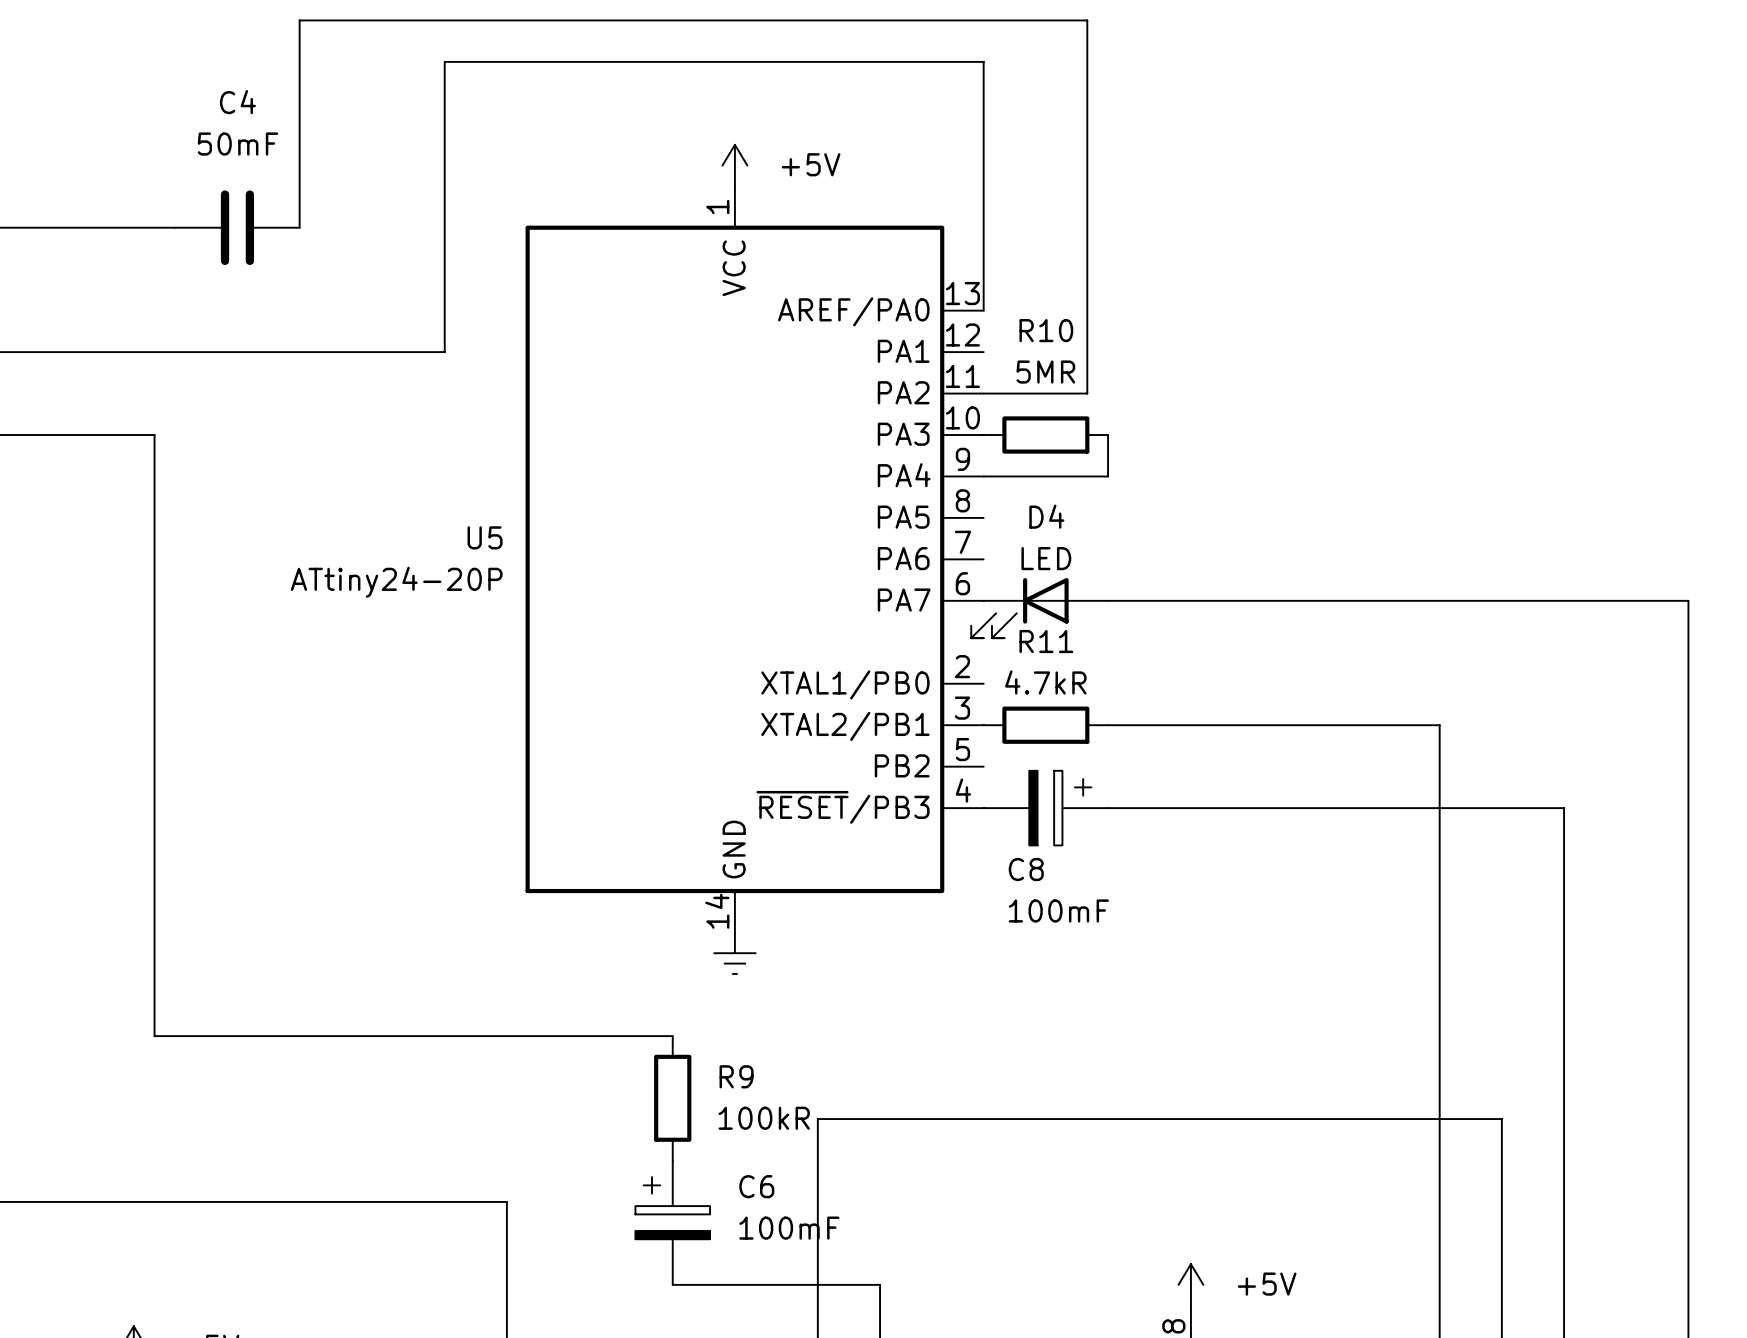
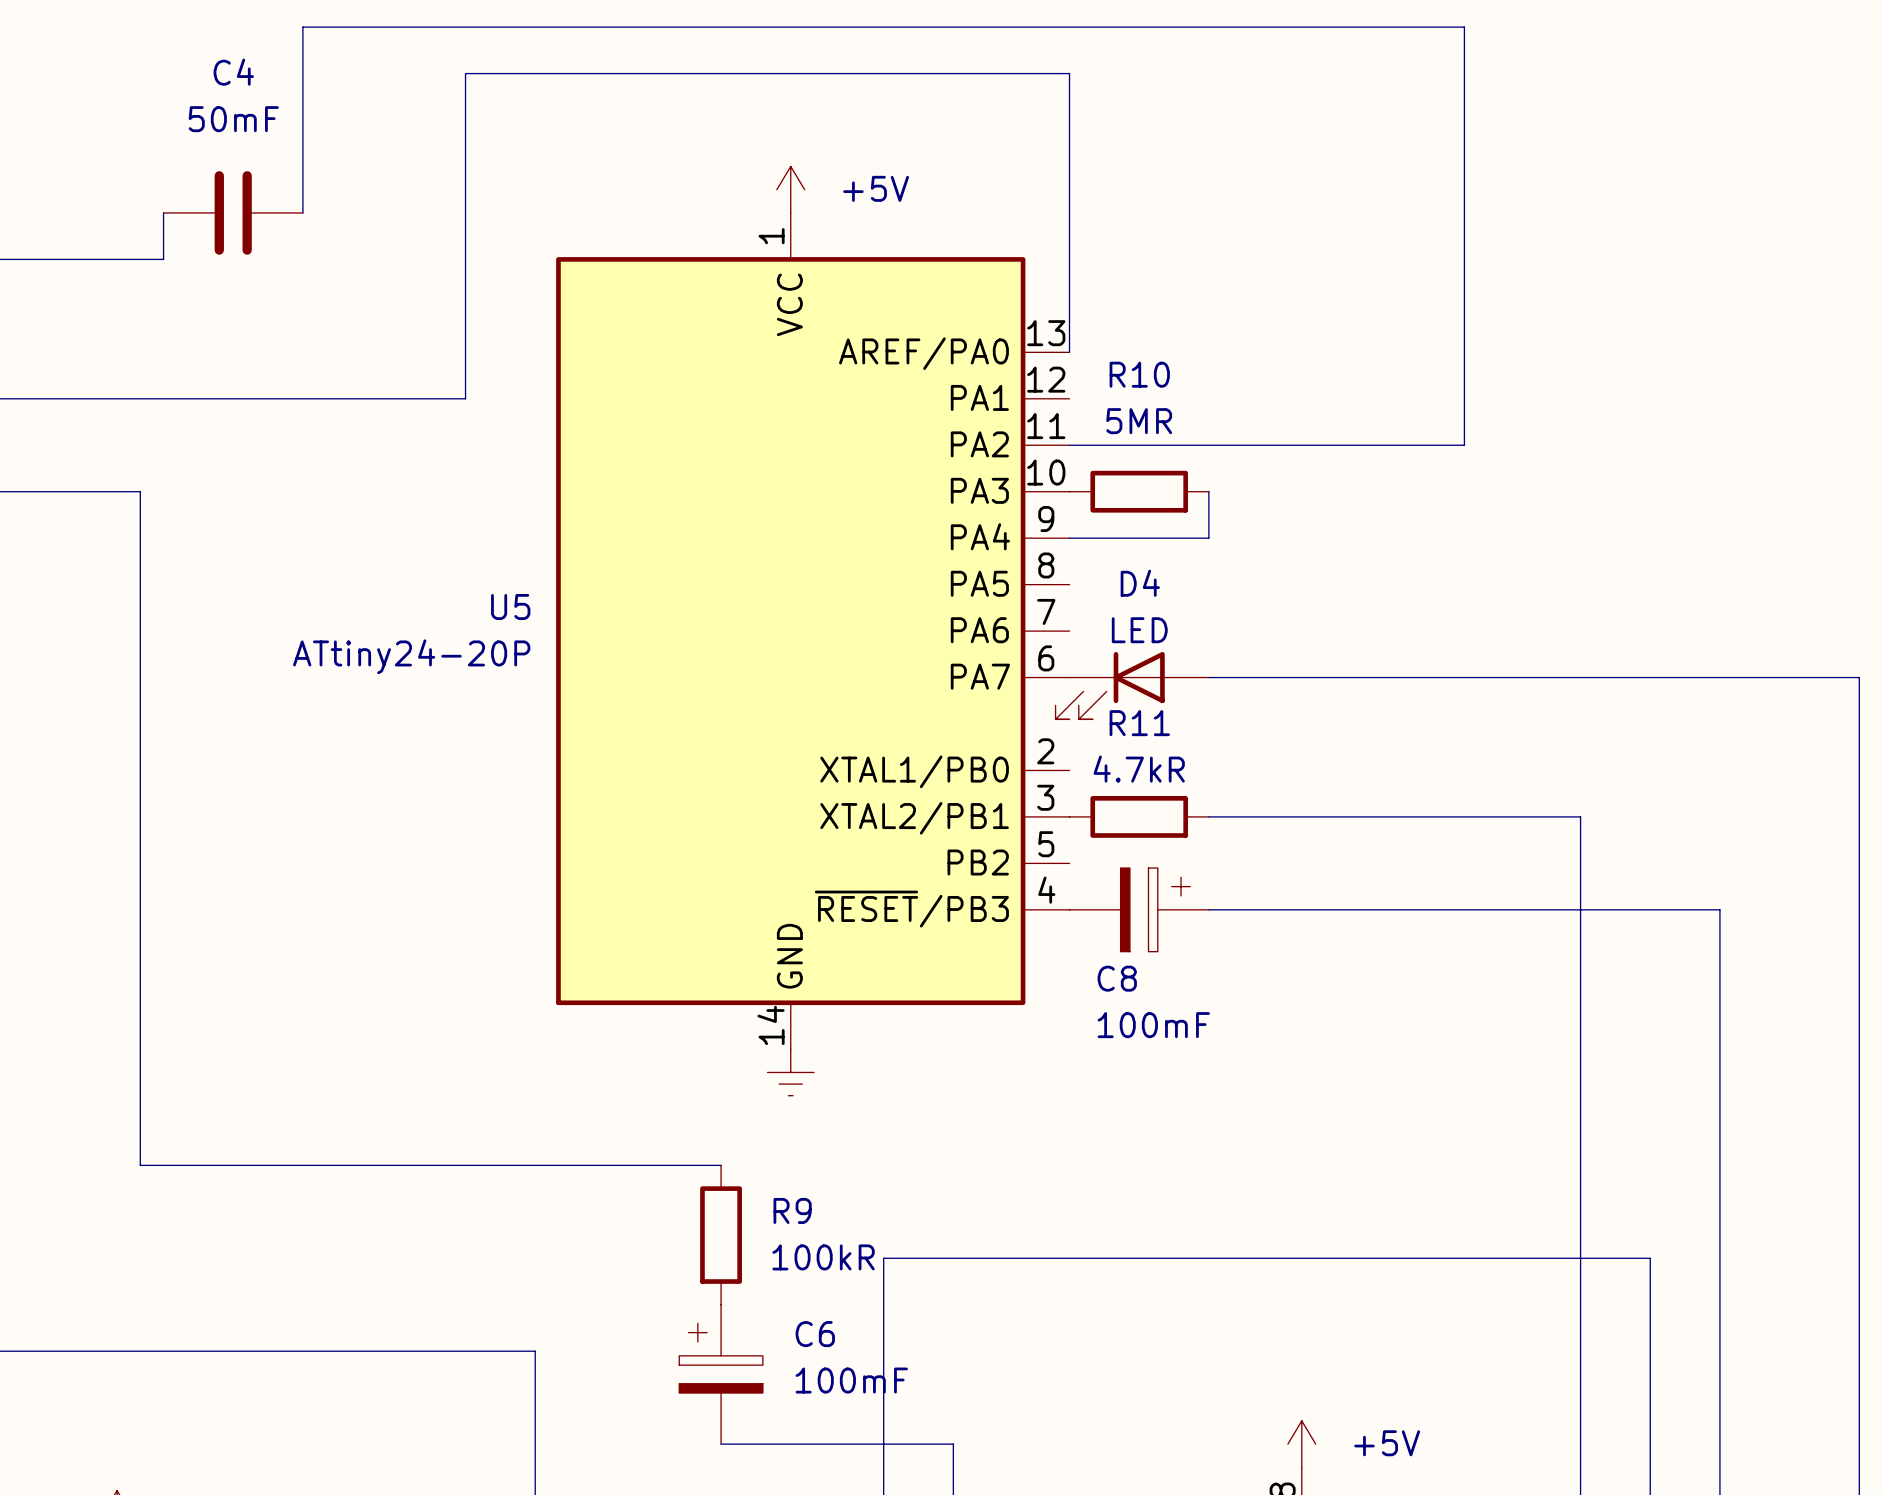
wire: (1087, 20) (1087, 393) -> (1185, 27) (1464, 27) (1464, 445) (1185, 445)
wire: (299, 186) (299, 227) -> (163, 212) (163, 259)
C4 position: (237, 227) -> (233, 212)

